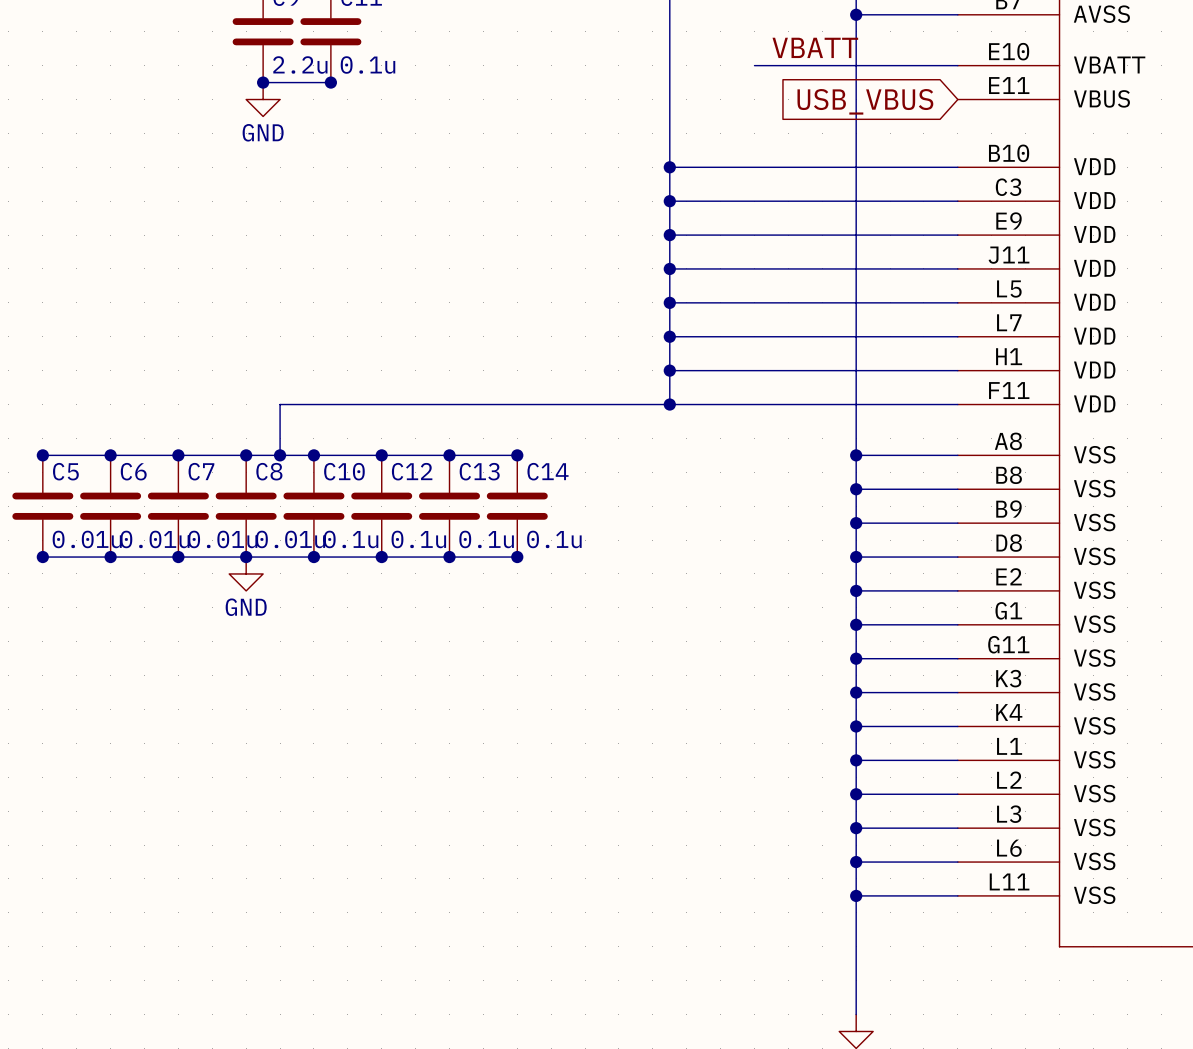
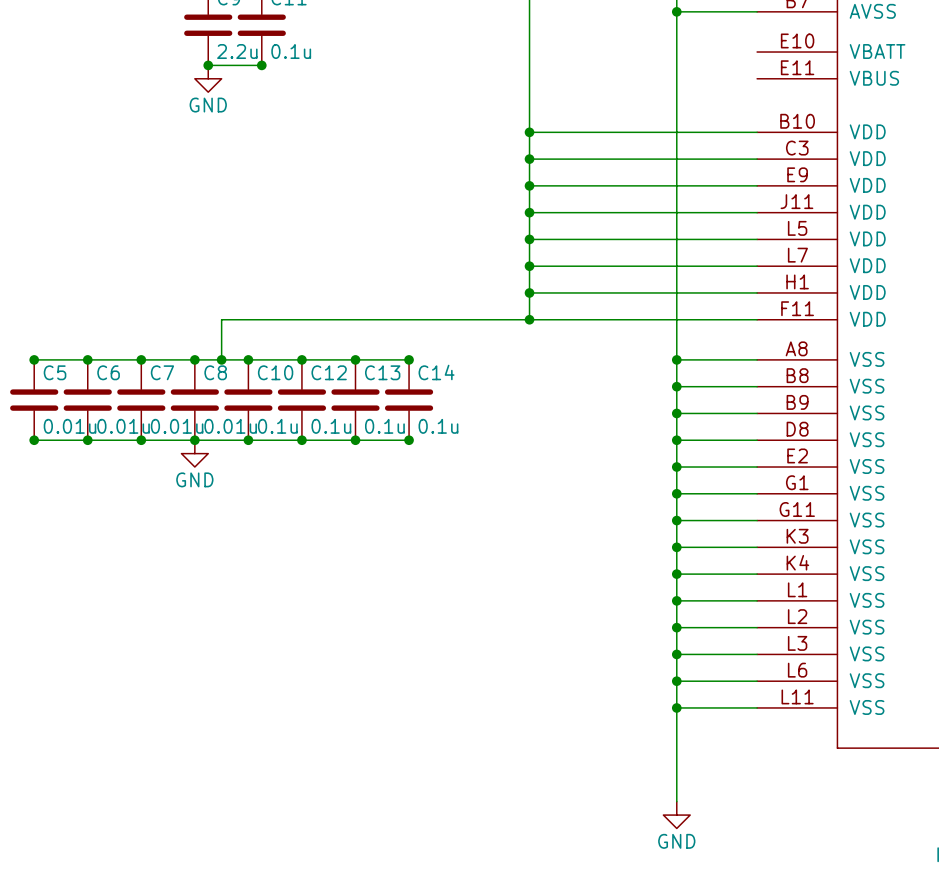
label: VBATT (815, 47) -> none
wire: (754, 65) (957, 65) -> none
global label: USB_VBUS (865, 101) -> none

